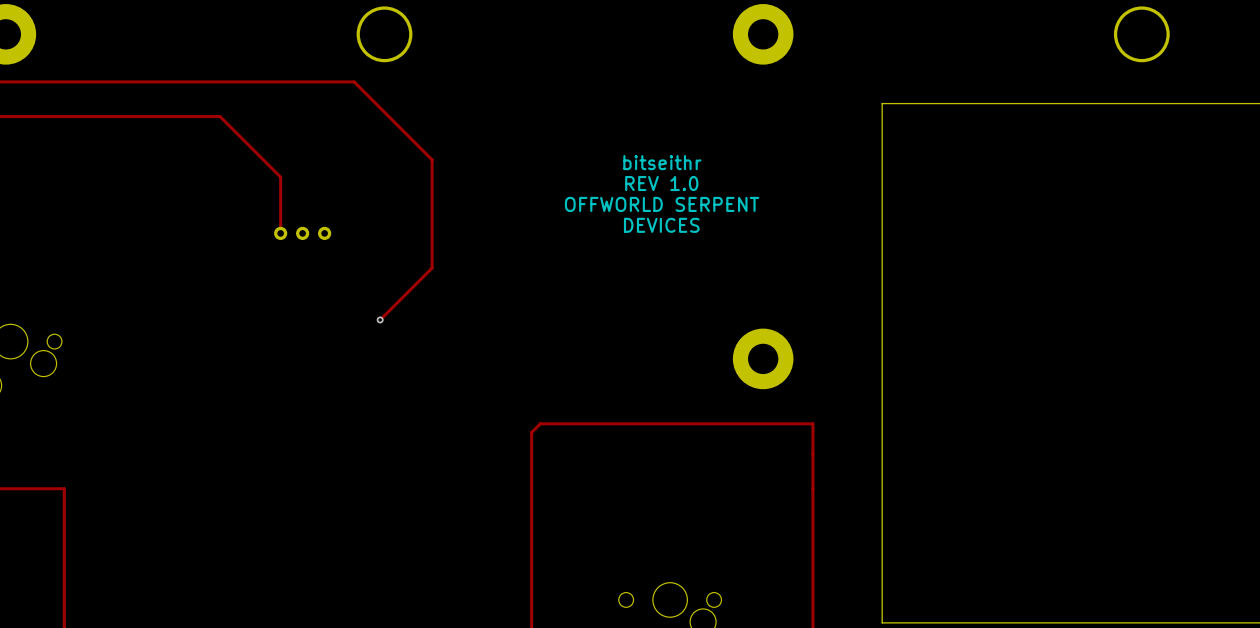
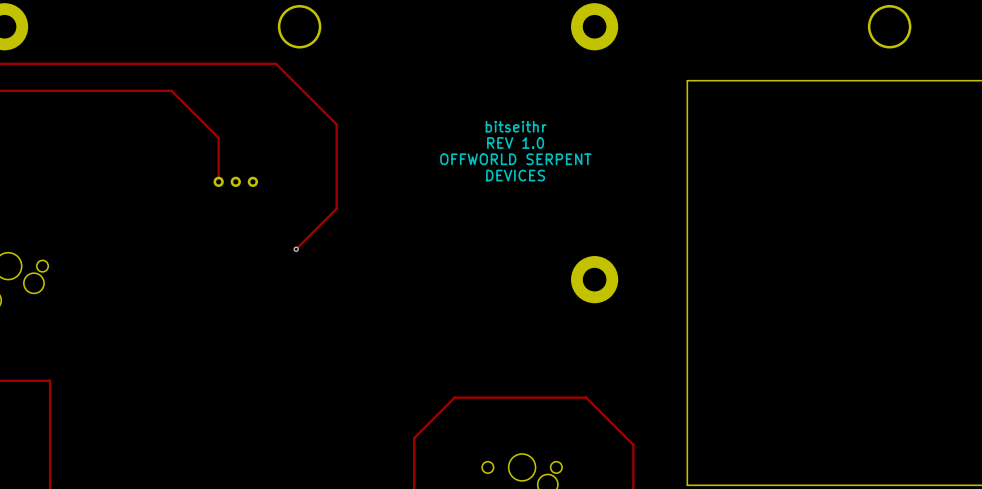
track: (531, 562) (531, 432) (540, 423) (812, 423) (812, 570) -> (414, 438) (454, 397) (586, 397) (633, 444)

